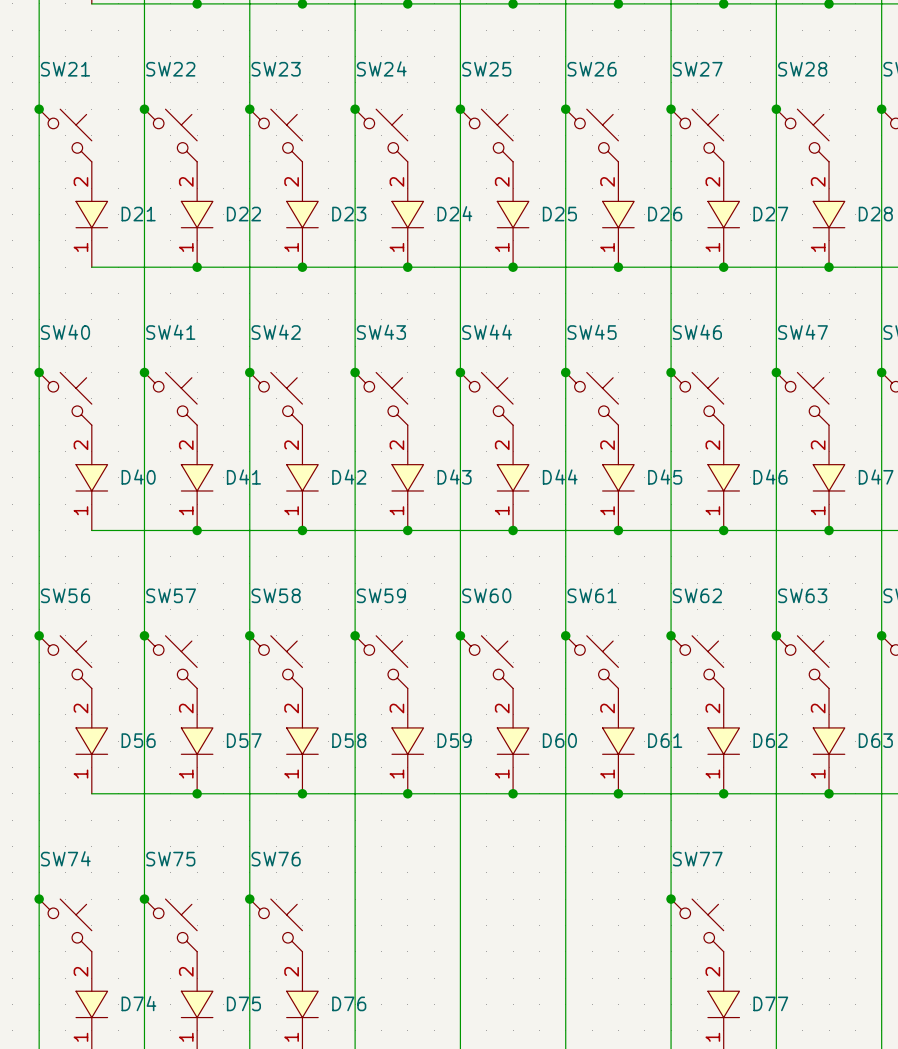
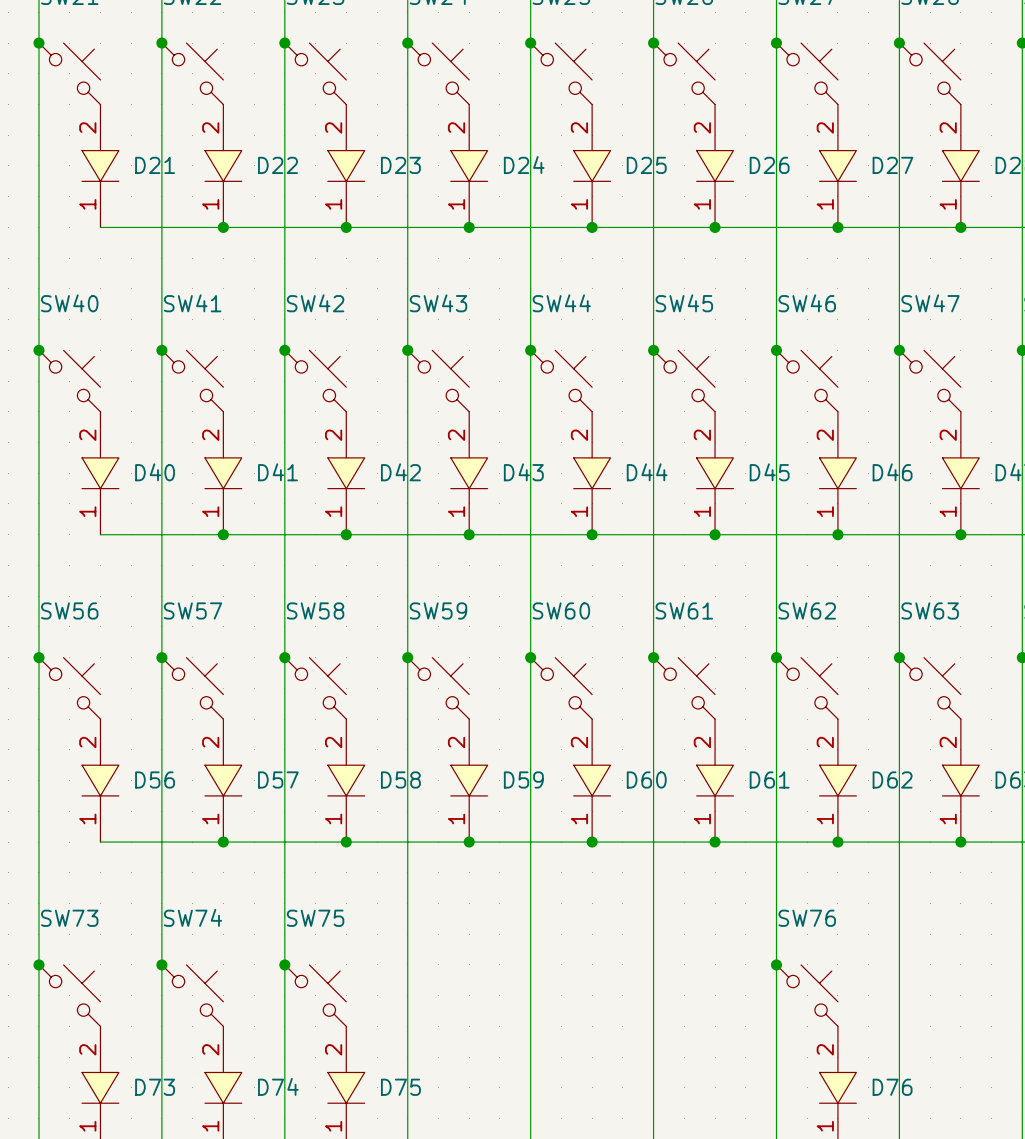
SW74 name: SW74 (65, 858) -> SW73 (69, 918)
SW75 name: SW75 (170, 859) -> SW74 (193, 917)
SW76 name: SW76 (276, 859) -> SW75 (315, 918)
SW77 name: SW77 (697, 859) -> SW76 (807, 918)
D74 name: D74 (138, 1003) -> D73 (155, 1087)
D75 name: D75 (243, 1003) -> D74 (278, 1086)
D76 name: D76 (349, 1003) -> D75 (400, 1087)
D77 name: D77 (770, 1003) -> D76 (892, 1087)

